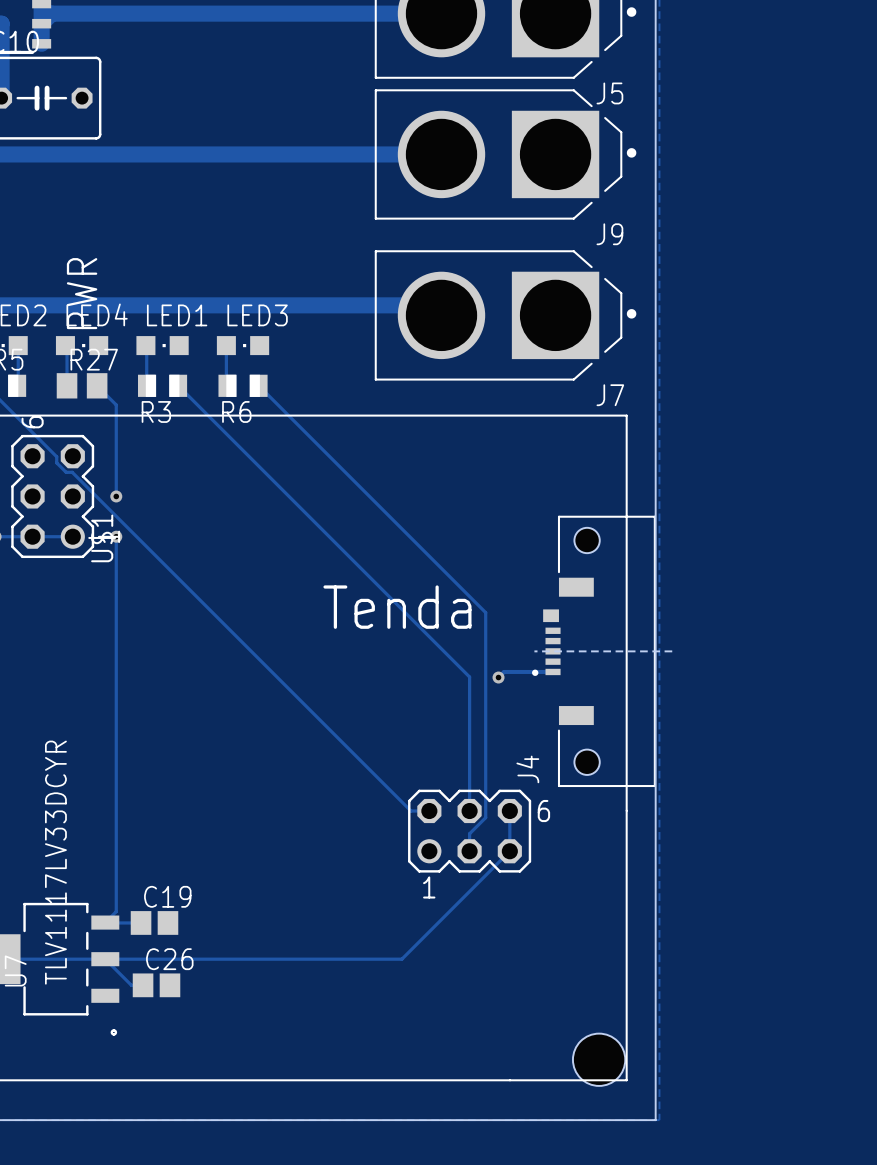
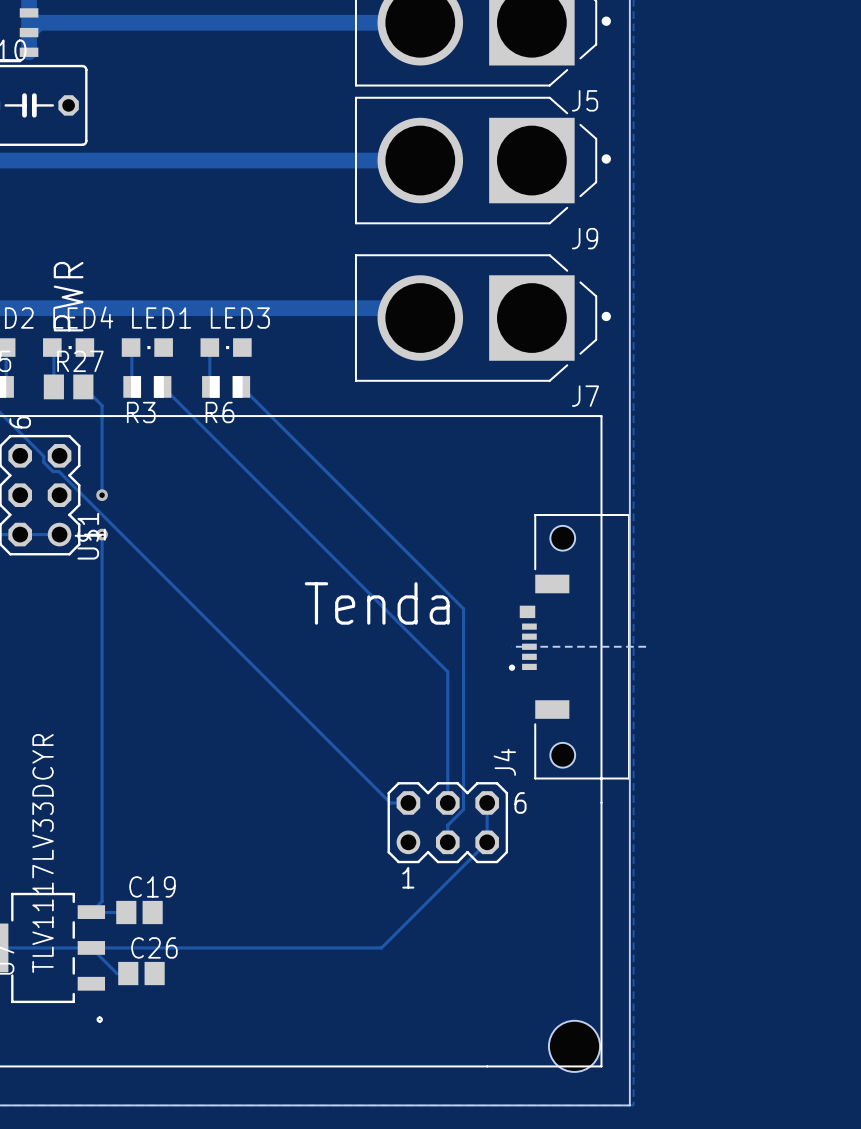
track: (553, 671) (504, 671) (498, 677) -> none
via: (498, 677) -> none

